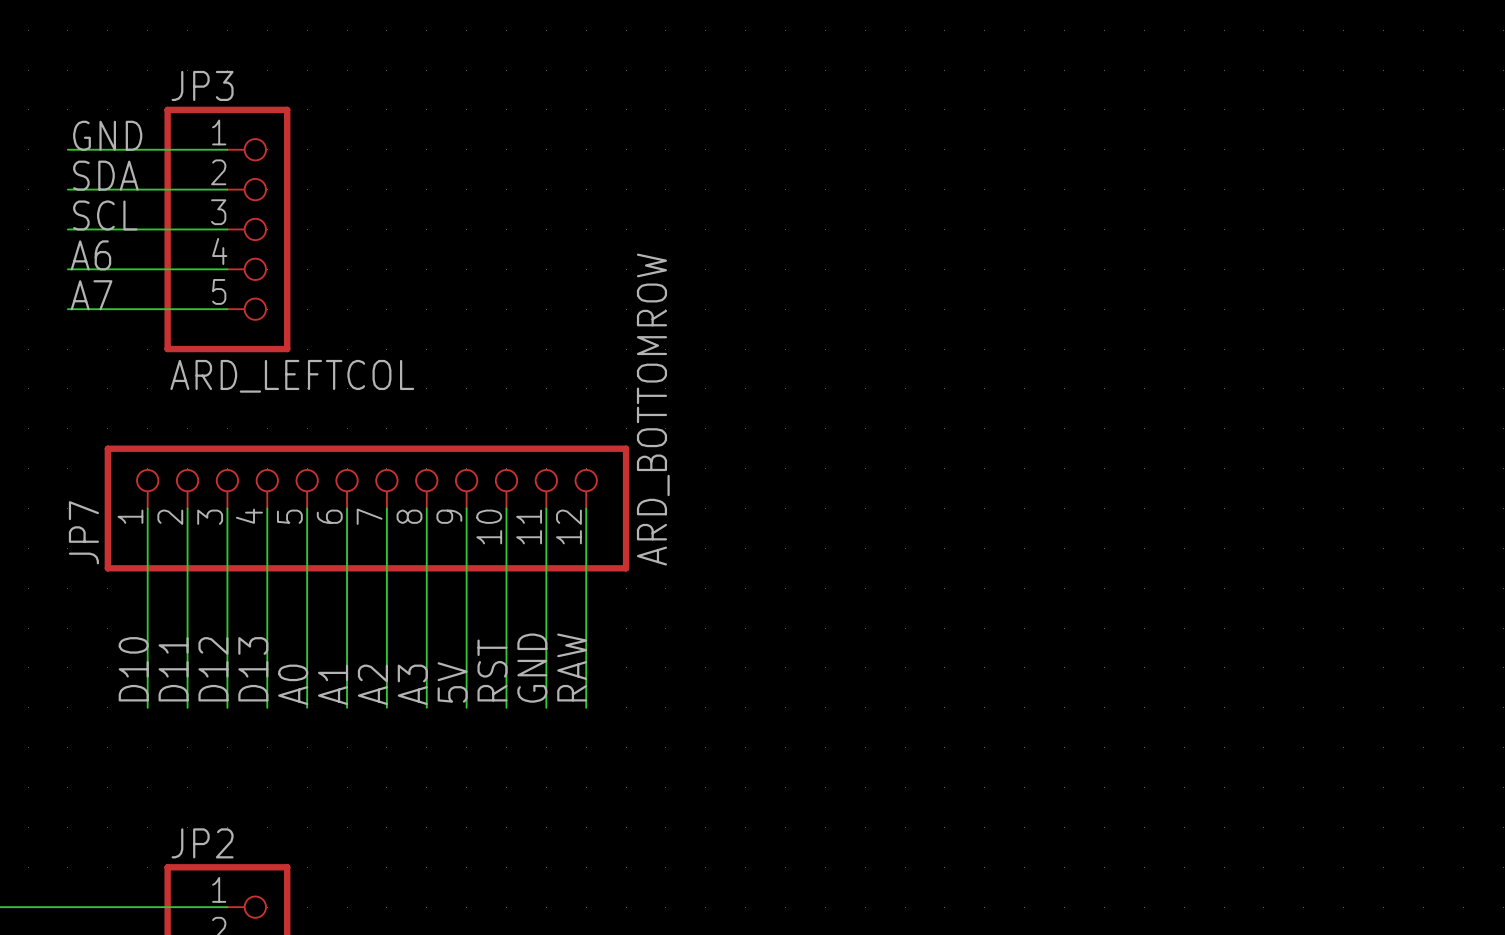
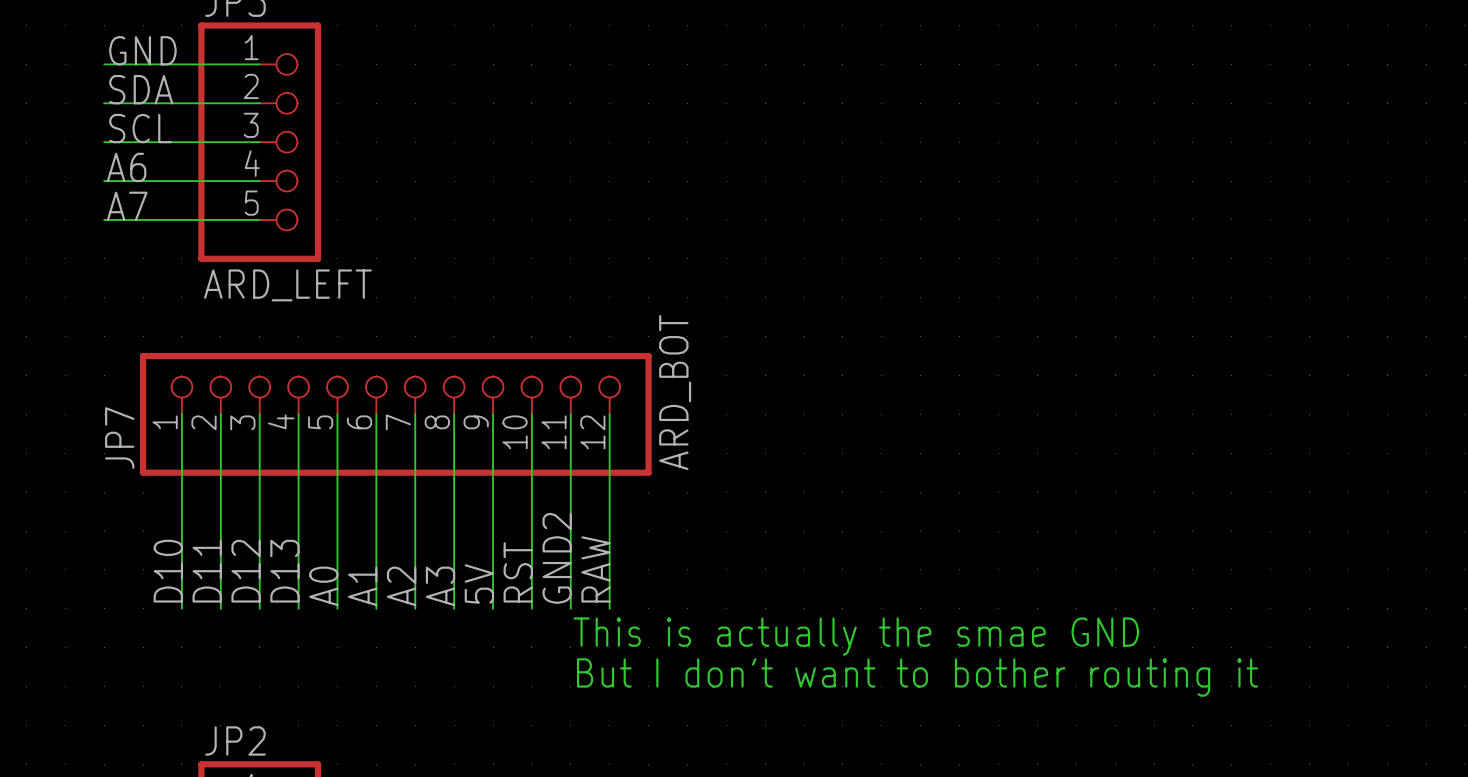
JP3 value: ARD_LEFTCOL (292, 376) -> ARD_LEFT (287, 285)
JP7 value: ARD_BOTTOMROW (653, 409) -> ARD_BOT (675, 392)
label: GND (532, 668) -> GND2 (557, 558)
text: none -> This is actually the smae GND (856, 636)
text: none -> But I don't want to bother routing it (917, 677)

